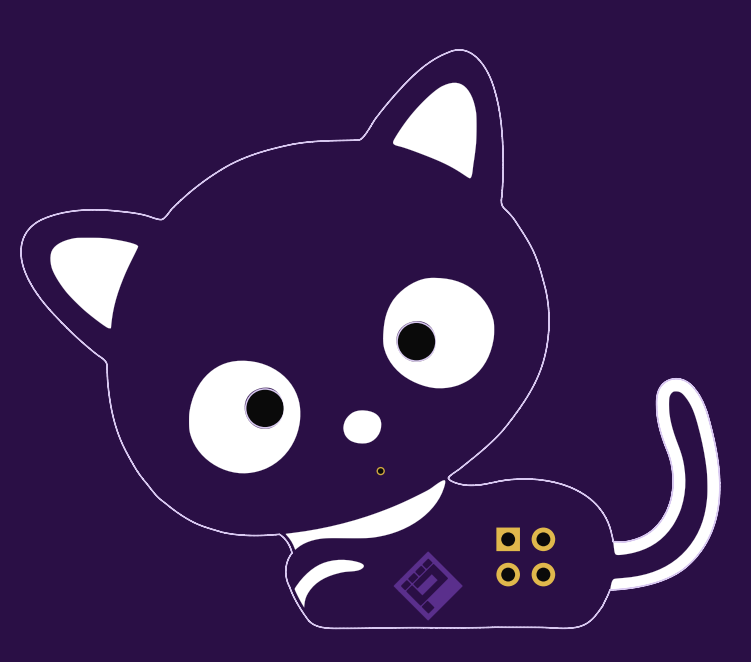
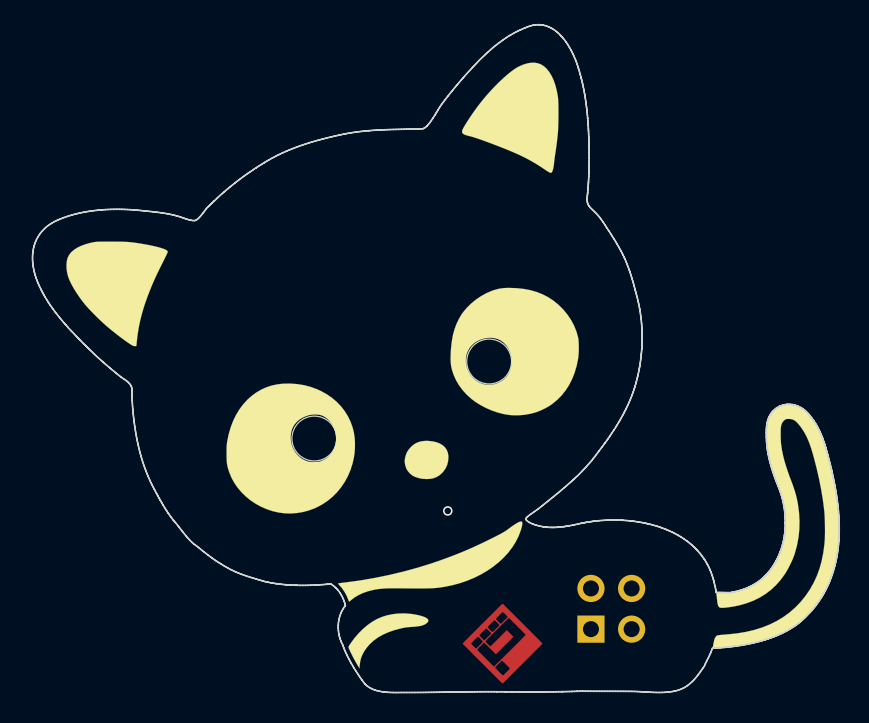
part rotation: 0° (525, 556) -> 90° counterclockwise (611, 608)

